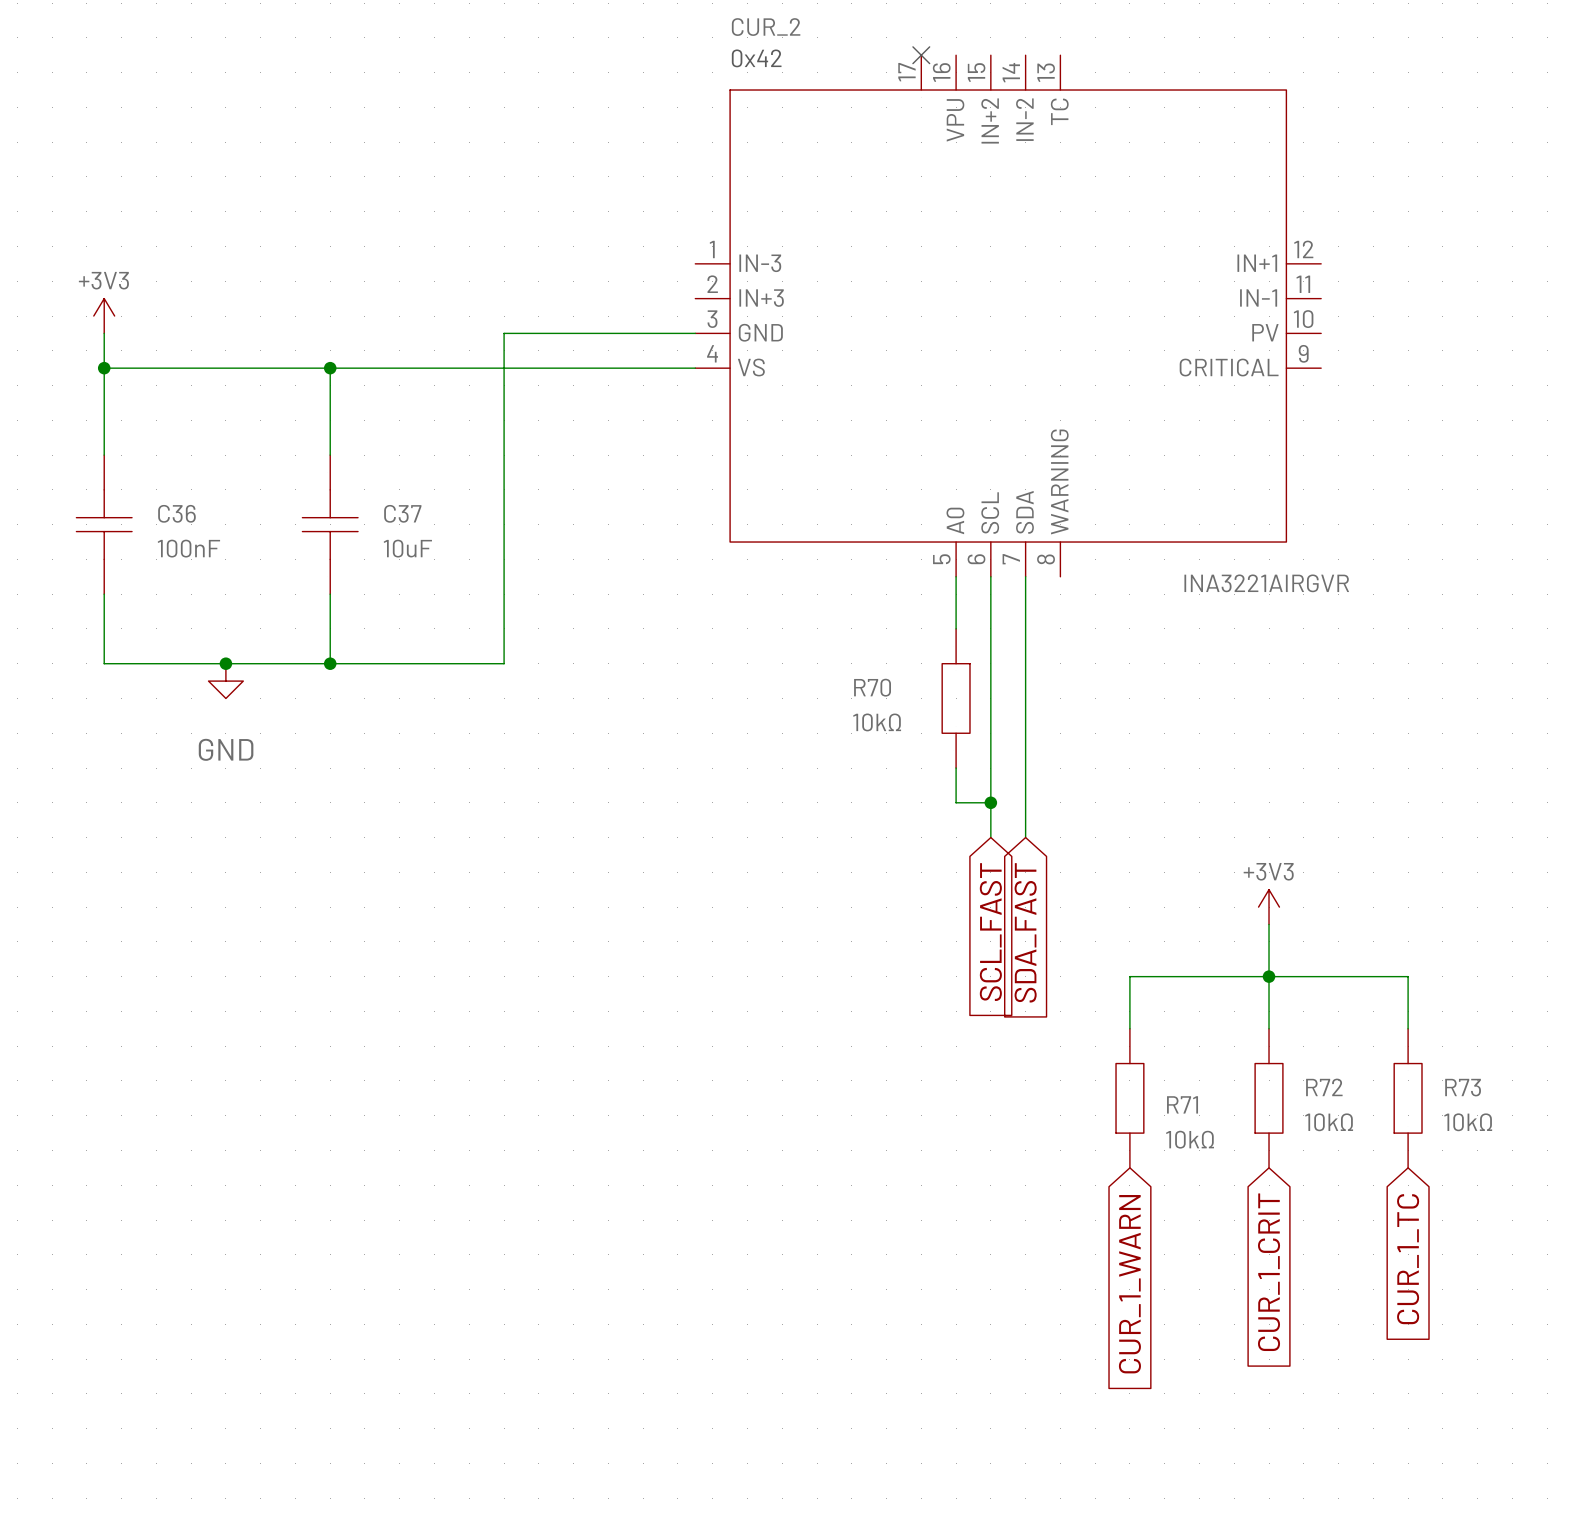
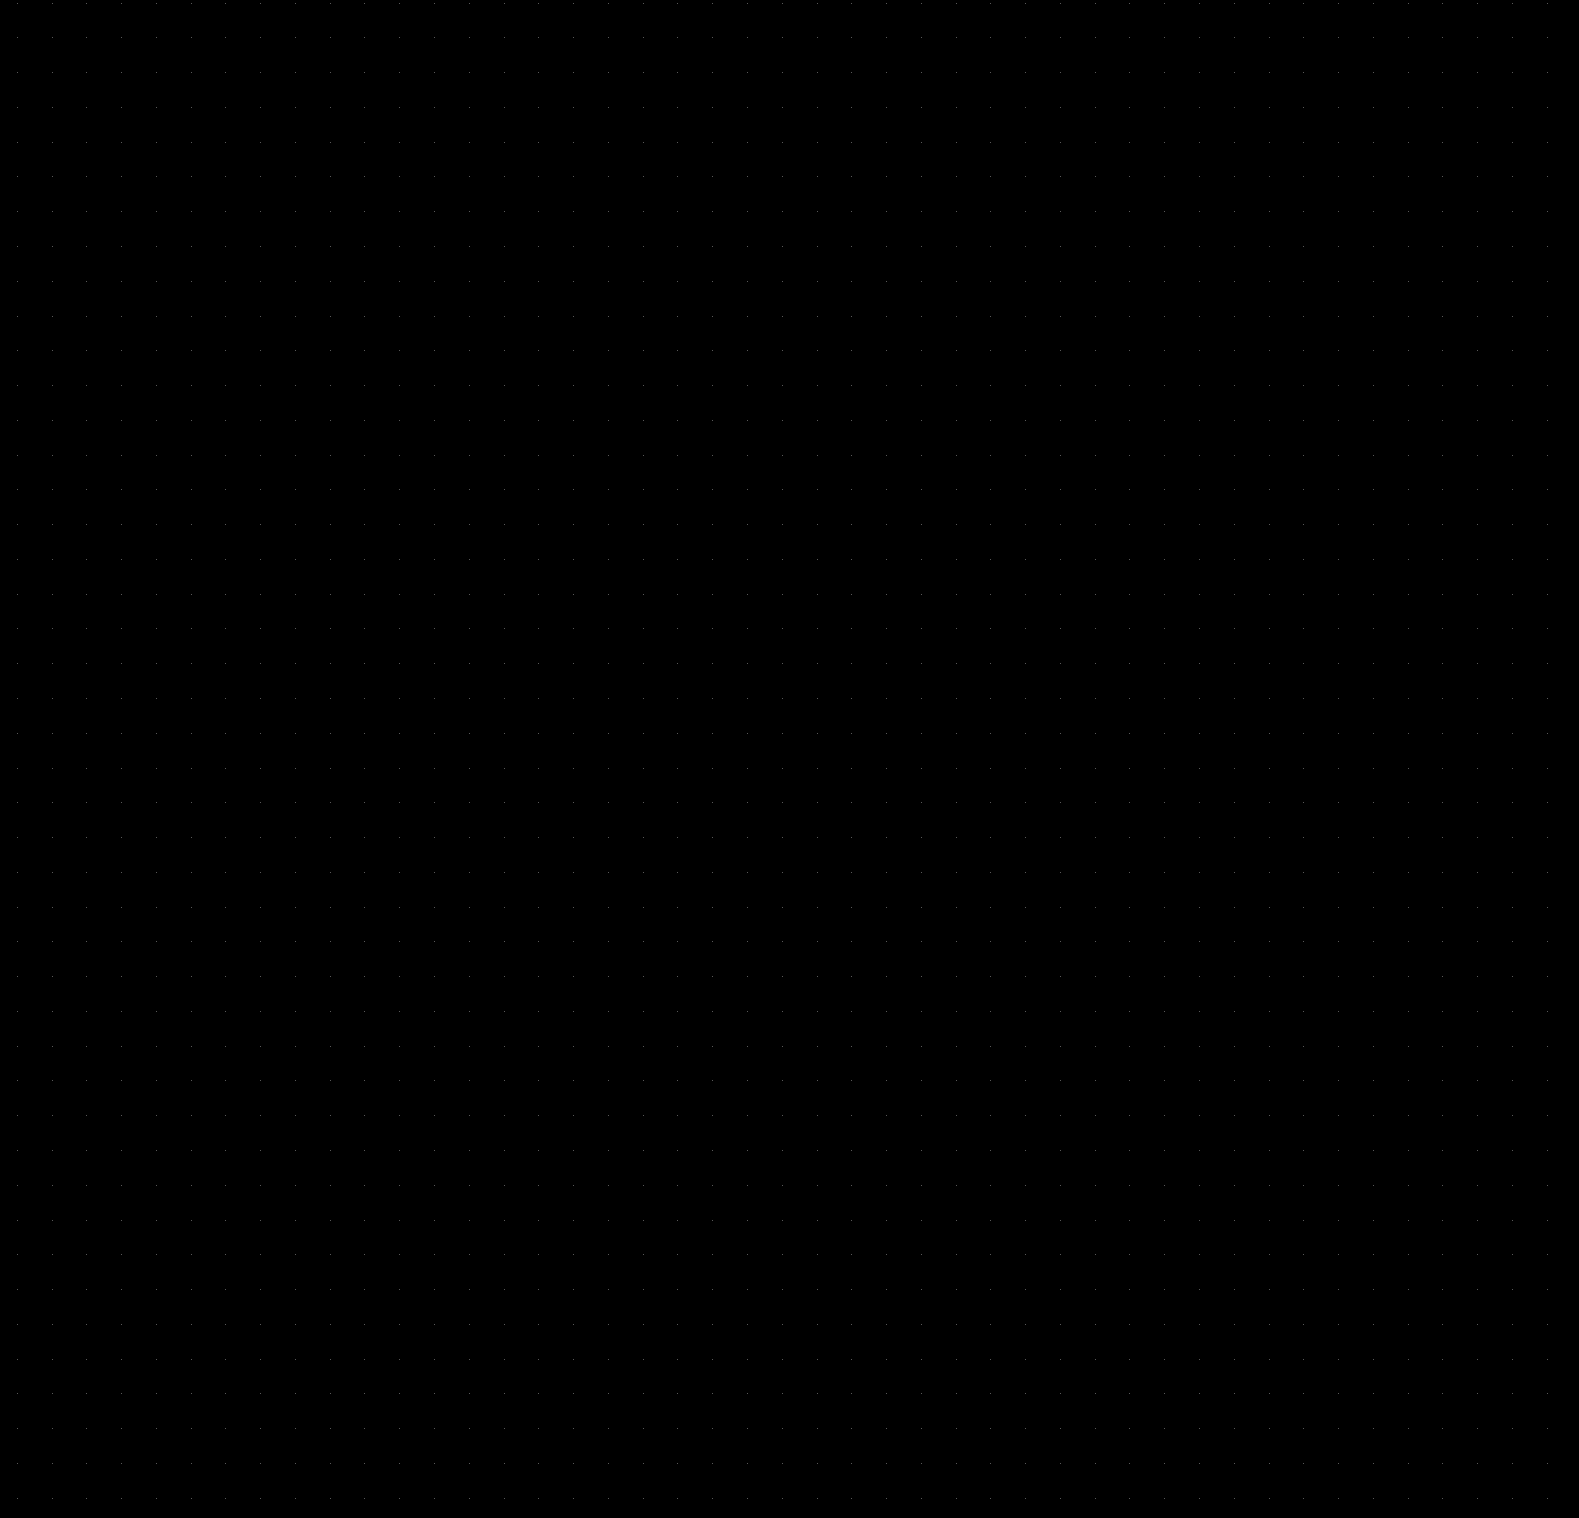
no-connect mark: (921, 55) -> none
text: 0x42 (756, 58) -> none
power symbol: +3V3 (104, 316) -> none
CUR_2: INA3221AIRGVR (1008, 316) -> none
wire: (104, 333) (104, 455) -> none
wire: (695, 333) (504, 333) (504, 663) (104, 663) (104, 594) -> none
wire: (104, 368) (695, 368) -> none
junction: (104, 368) -> none
wire: (330, 368) (330, 455) -> none
junction: (330, 368) -> none
C36: 100nF (104, 524) -> none
C37: 10uF (330, 524) -> none
wire: (956, 576) (956, 628) -> none
wire: (990, 576) (990, 837) -> none
wire: (1025, 576) (1025, 837) -> none
wire: (330, 594) (330, 663) -> none
junction: (225, 663) -> none
junction: (330, 663) -> none
power symbol: GND (225, 681) -> none
R70: 10kΩ (956, 698) -> none
wire: (956, 768) (956, 802) (990, 802) -> none
junction: (990, 802) -> none
power symbol: +3V3 (1269, 907) -> none
wire: (1269, 924) (1269, 1028) -> none
global label: SCL_FAST (990, 932) -> none
global label: SDA_FAST (1025, 932) -> none
junction: (1269, 976) -> none
wire: (1129, 1028) (1129, 976) (1408, 976) (1408, 1028) -> none
R71: 10kΩ (1129, 1098) -> none
R72: 10kΩ (1269, 1098) -> none
R73: 10kΩ (1408, 1098) -> none
global label: CUR_1_TC (1408, 1259) -> none
global label: CUR_1_CRIT (1269, 1272) -> none
global label: CUR_1_WARN (1129, 1284) -> none

